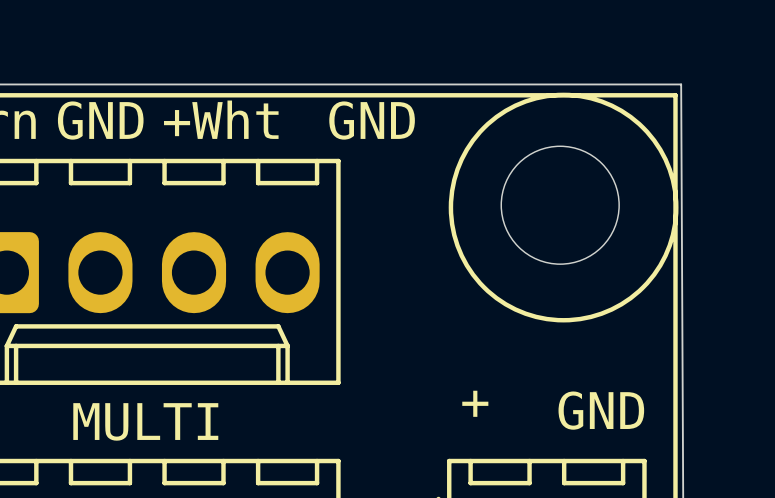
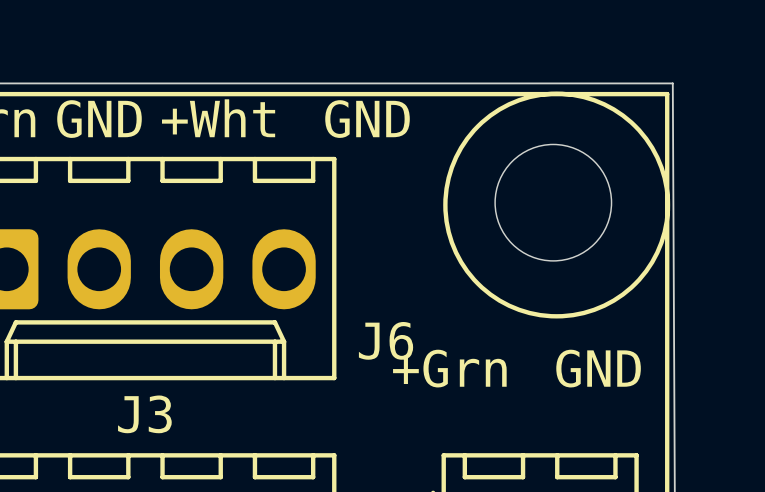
J6 name: none -> J6 (386, 340)
text: + (475, 403) -> +Grn (449, 368)
text position: GND (601, 410) -> GND (598, 368)
J3 name: none -> J3 (144, 414)
J6 value: MULTI (145, 421) -> none

